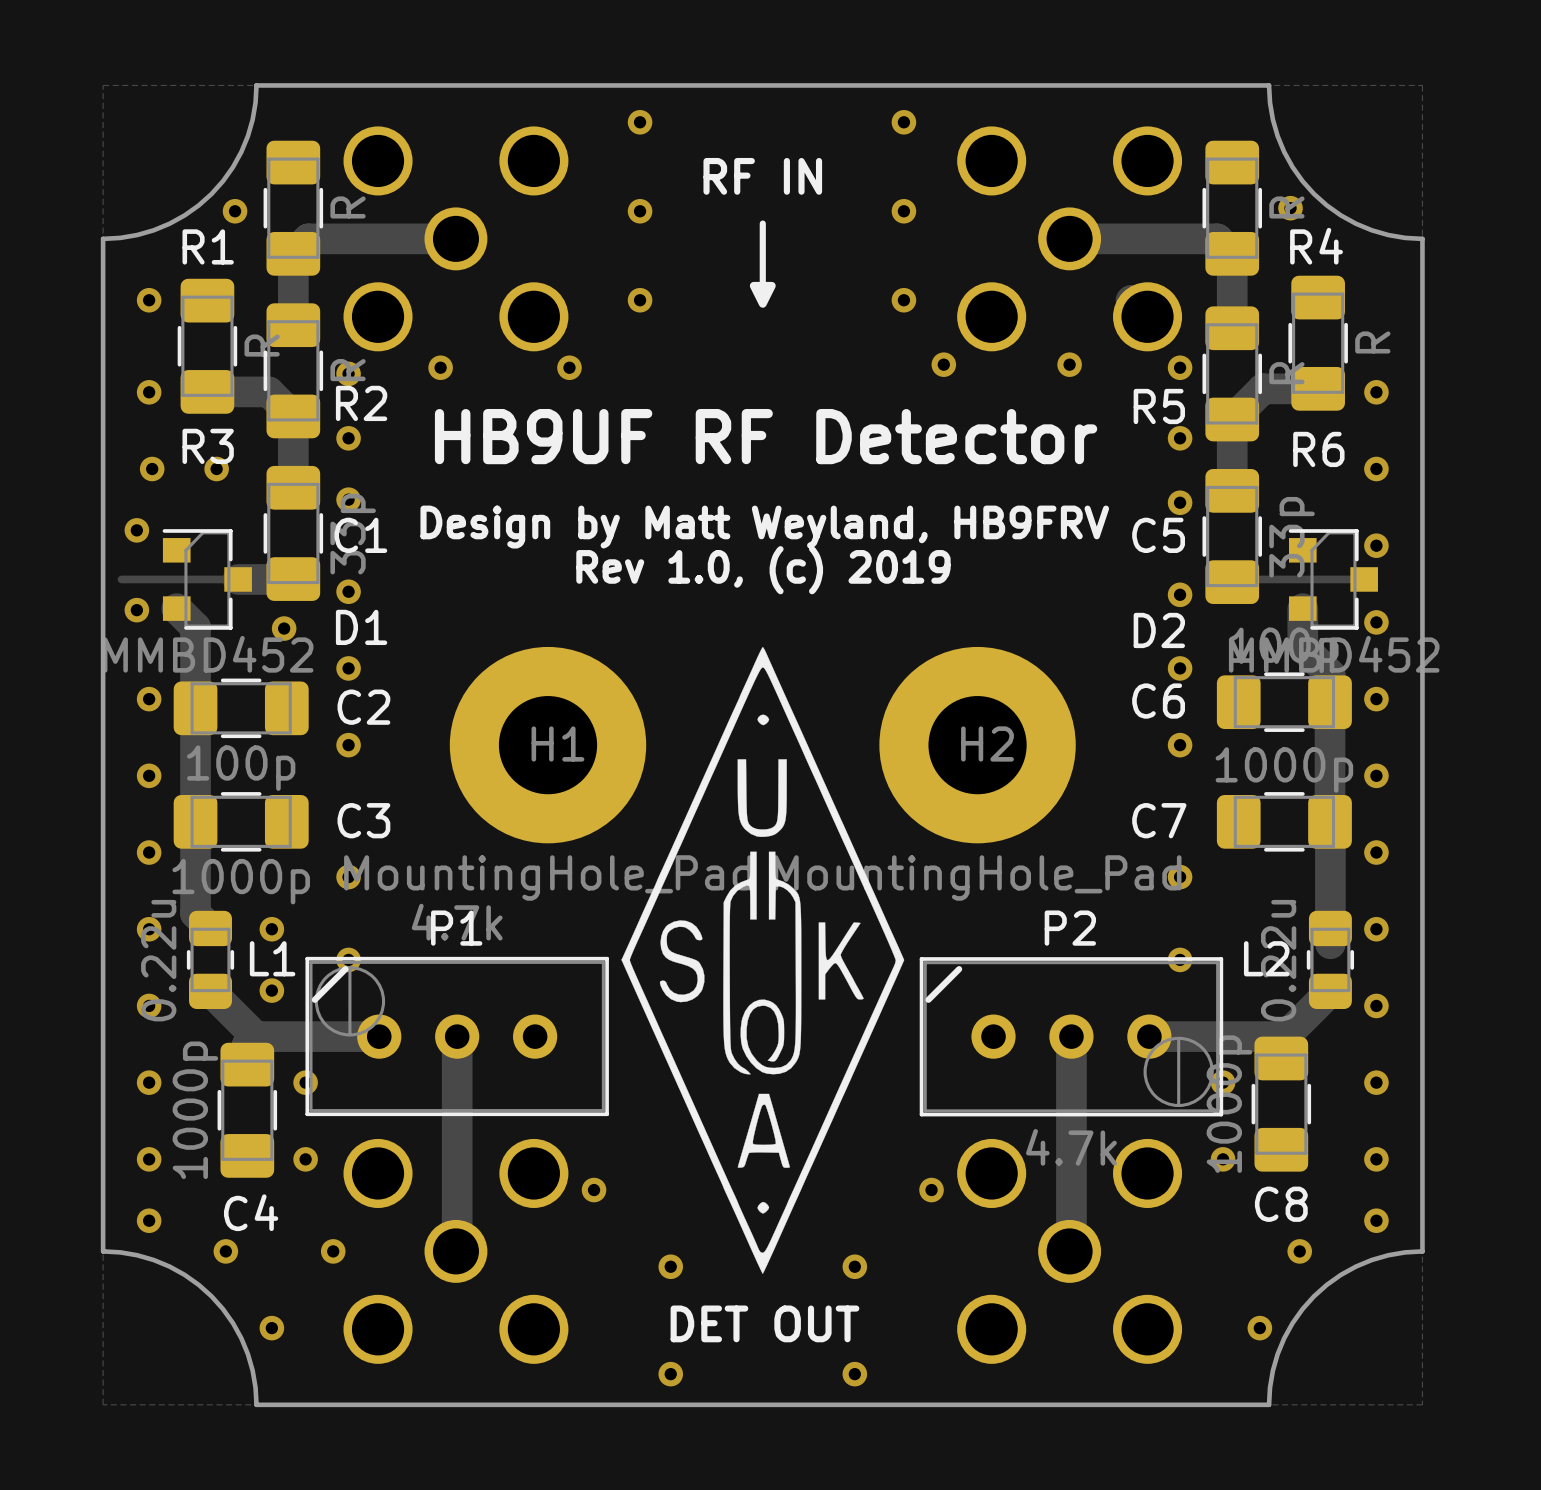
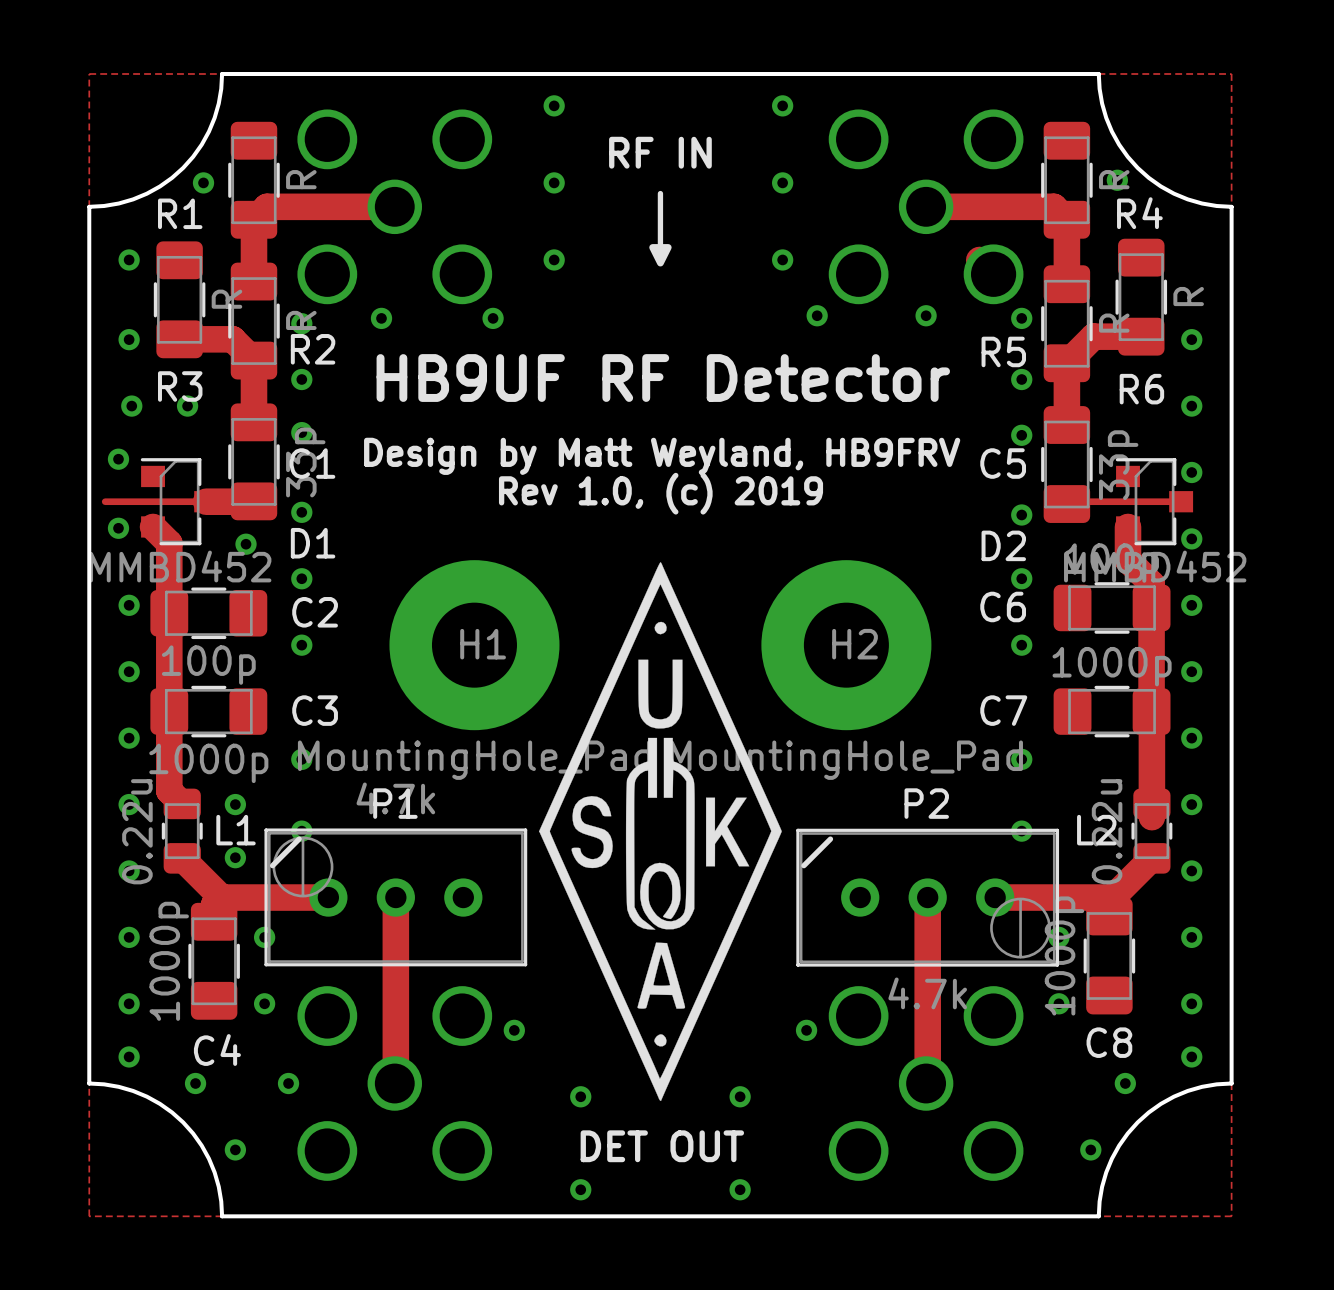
drawing shape: [621, 646, 905, 1274] -> [539, 562, 782, 1102]

